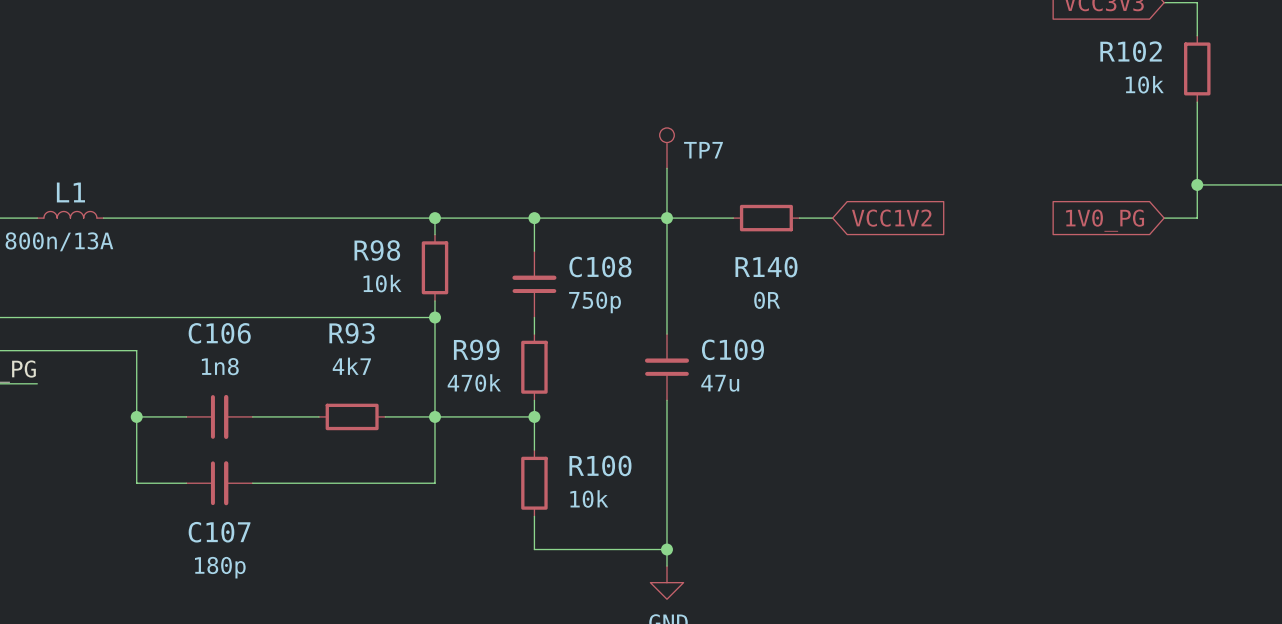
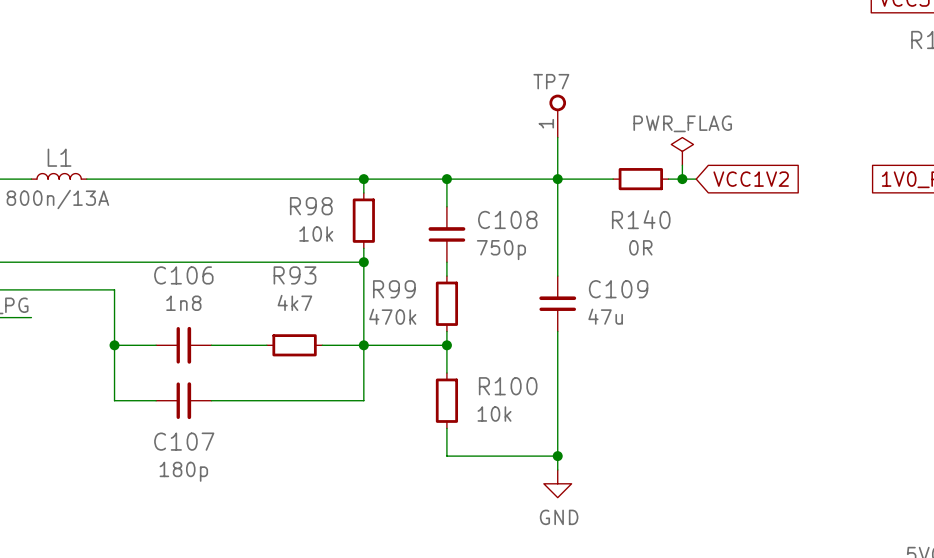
TP7 symbol: [659, 127, 675, 169] -> [549, 94, 567, 138]
TP7 name position: TP7 (703, 150) -> TP7 (551, 81)
power symbol: none -> PWR_FLAG (682, 151)
wire: none -> (682, 165) (682, 179)
junction: none -> (682, 179)

